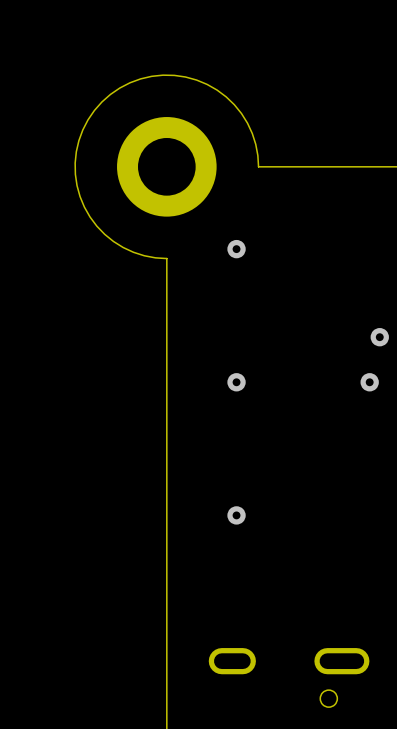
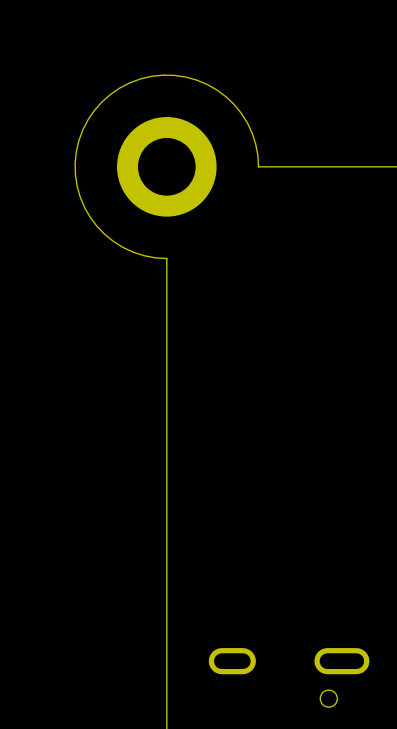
via: (236, 249) -> none
via: (379, 337) -> none
via: (236, 382) -> none
via: (369, 382) -> none
via: (236, 515) -> none

